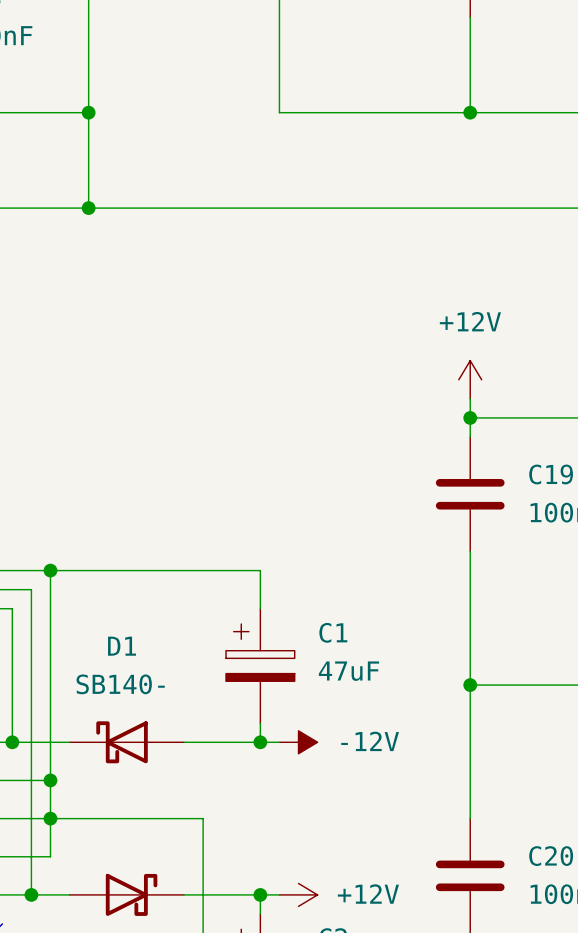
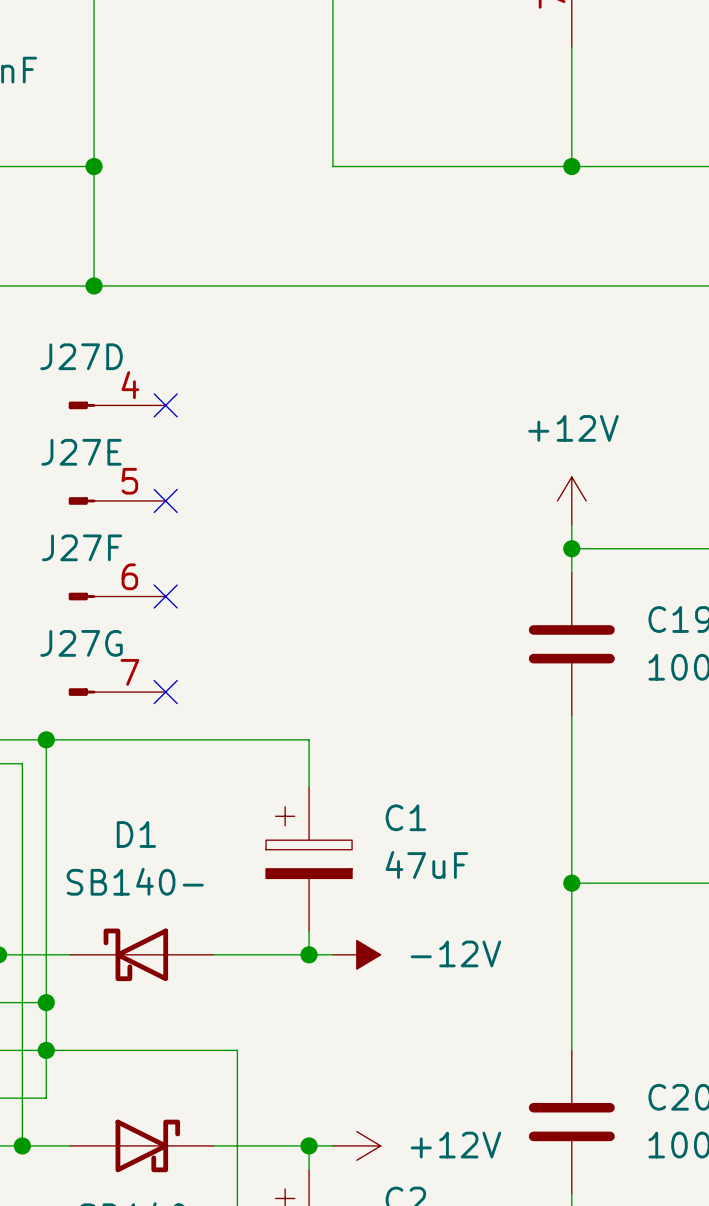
J27D: none -> (117, 405)
no-connect mark: none -> (165, 405)
J27E: none -> (117, 500)
no-connect mark: none -> (165, 500)
J27F: none -> (117, 596)
no-connect mark: none -> (165, 596)
J27G: none -> (117, 692)
no-connect mark: none -> (165, 692)

